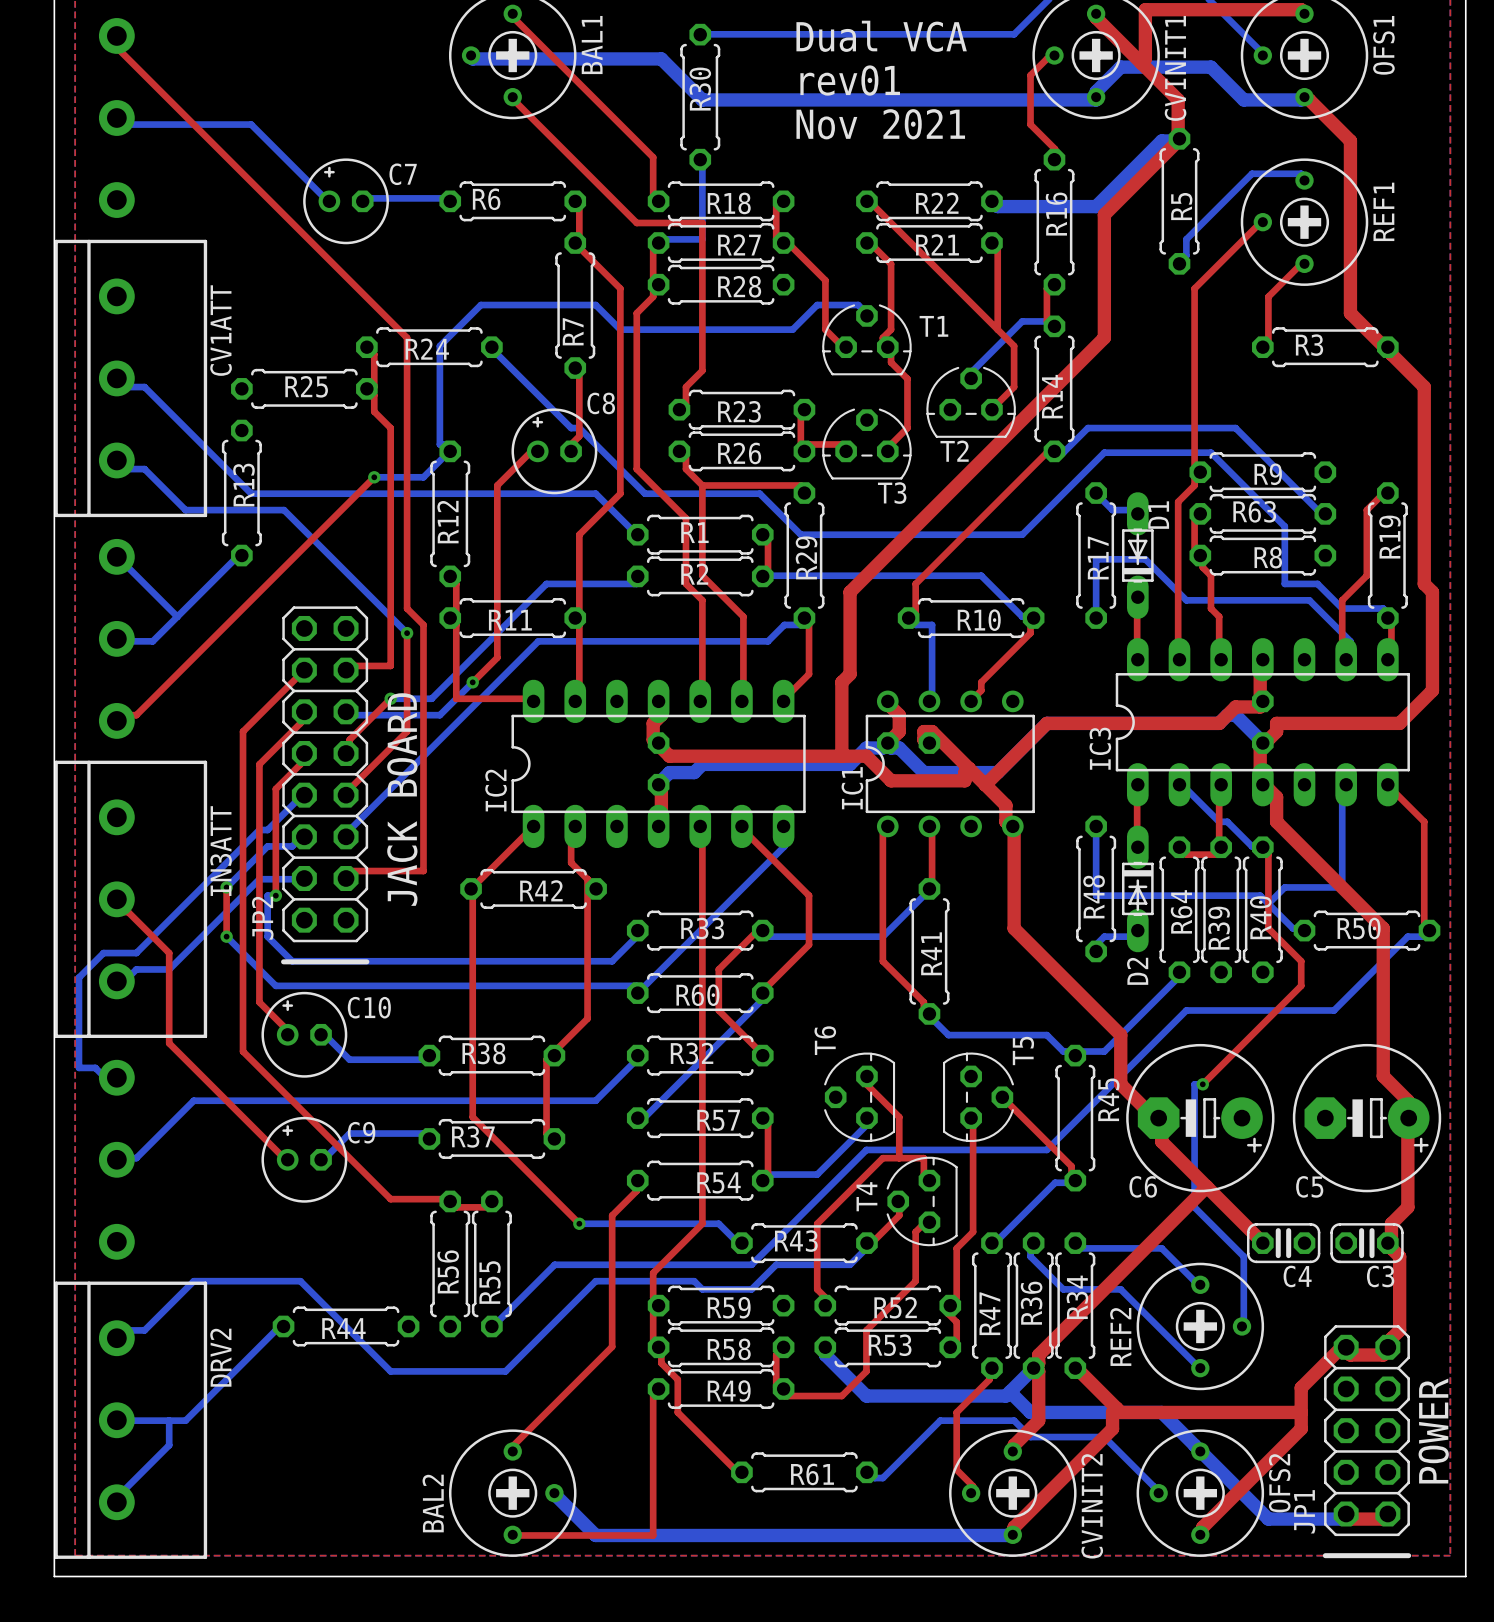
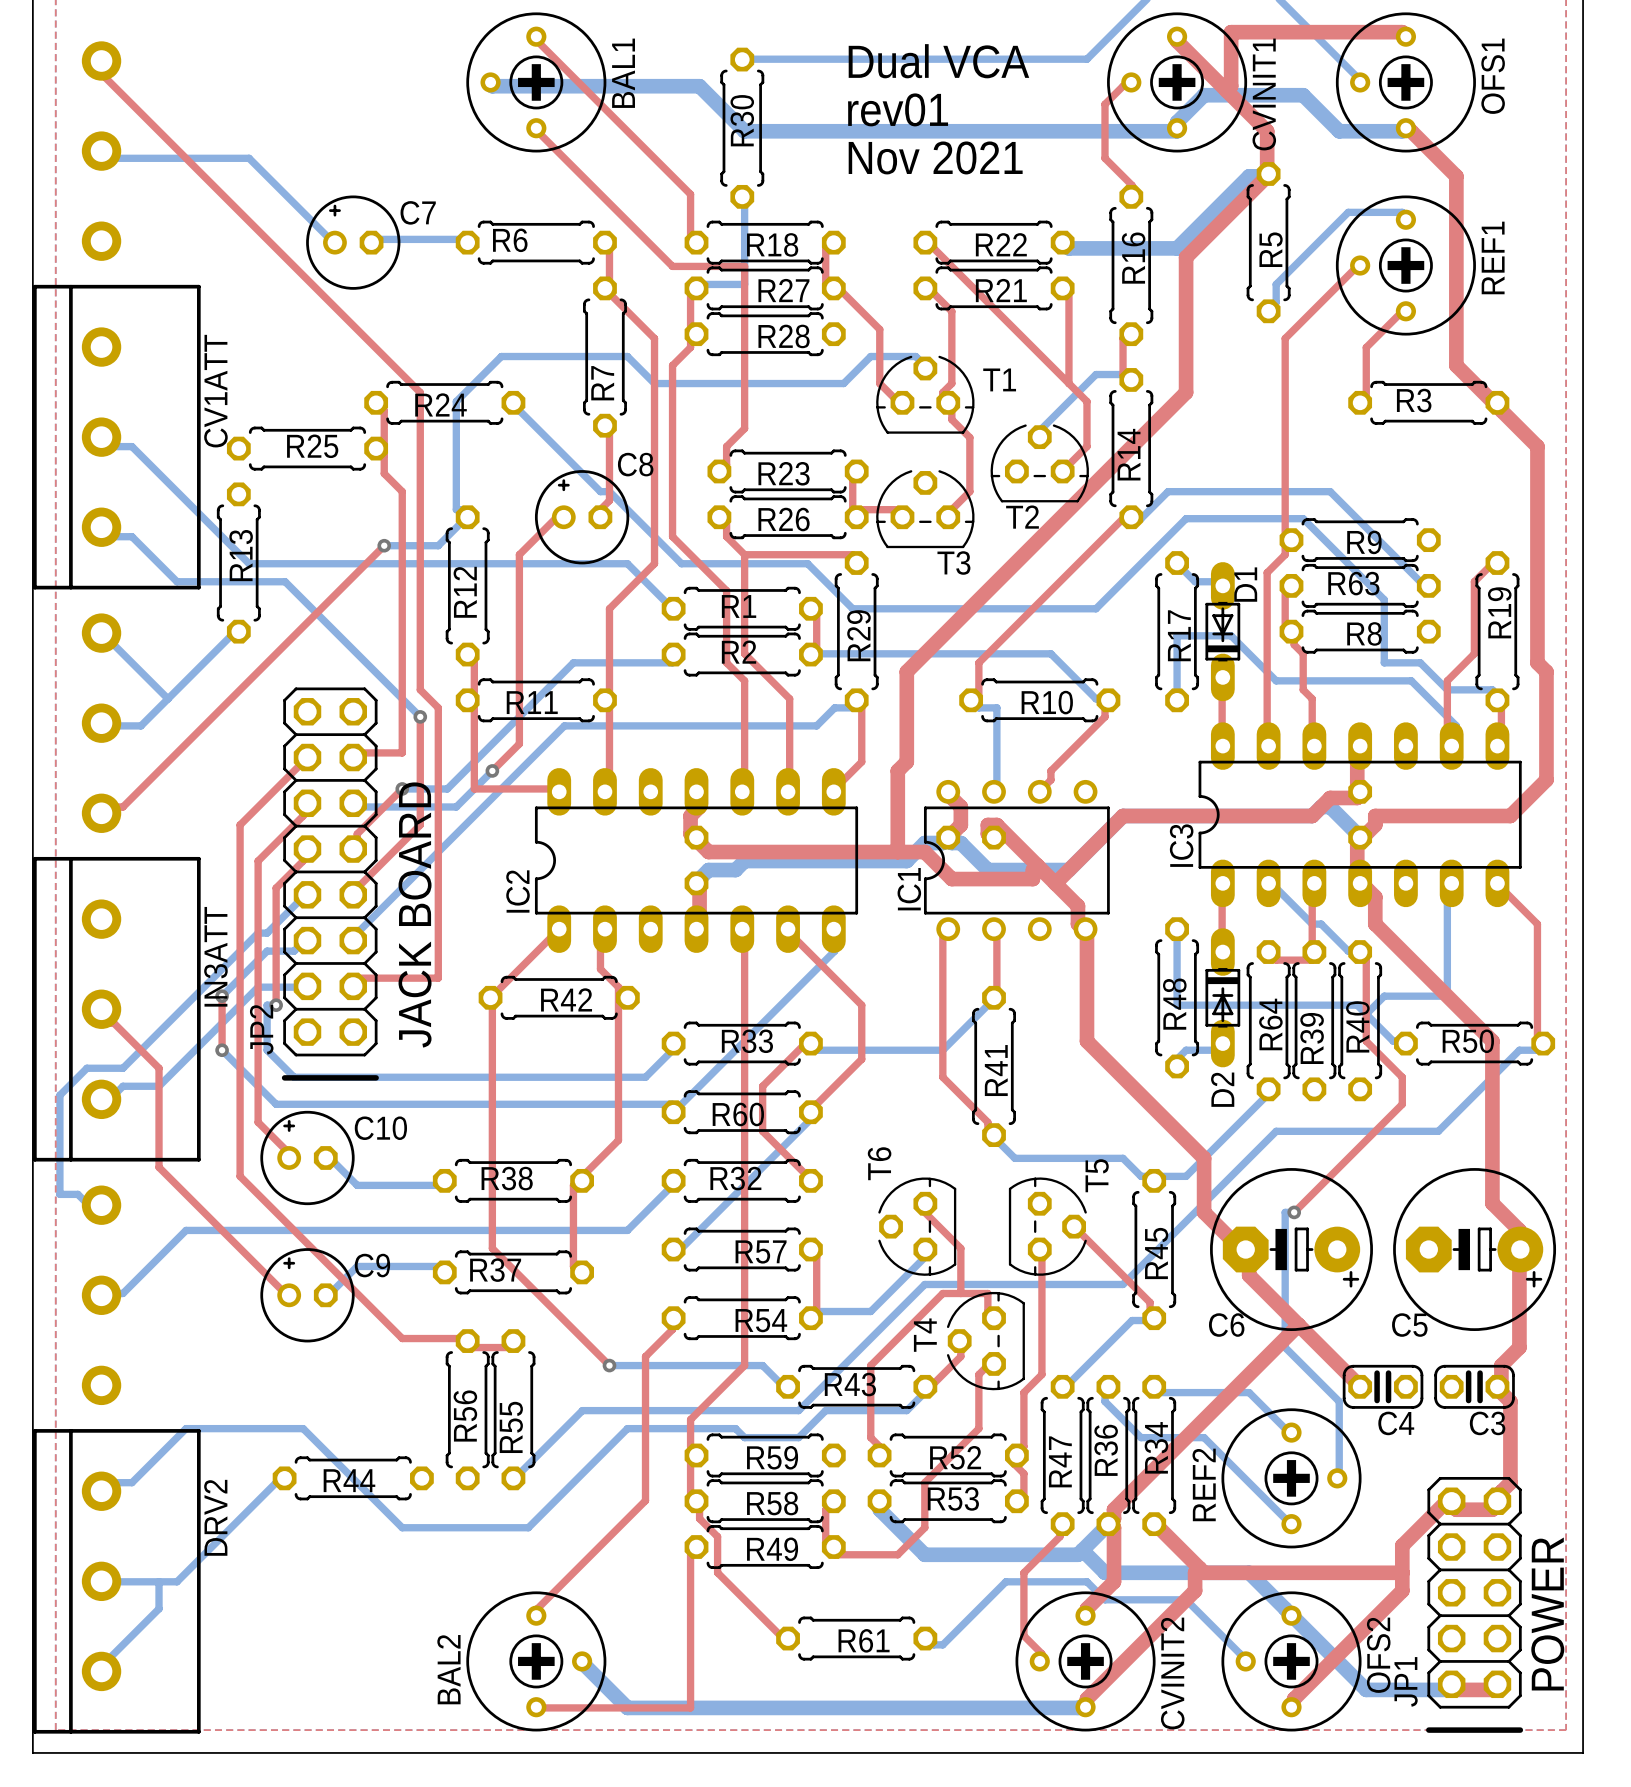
R45 name position: R45 (1108, 1099) -> R45 (1156, 1253)

